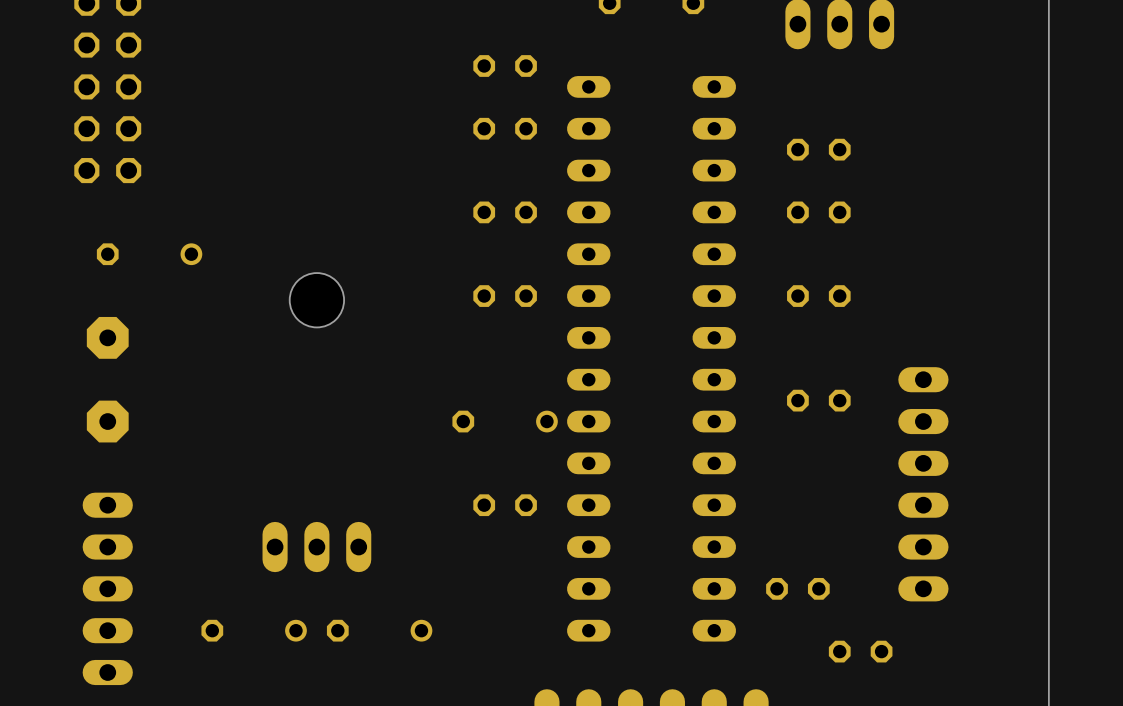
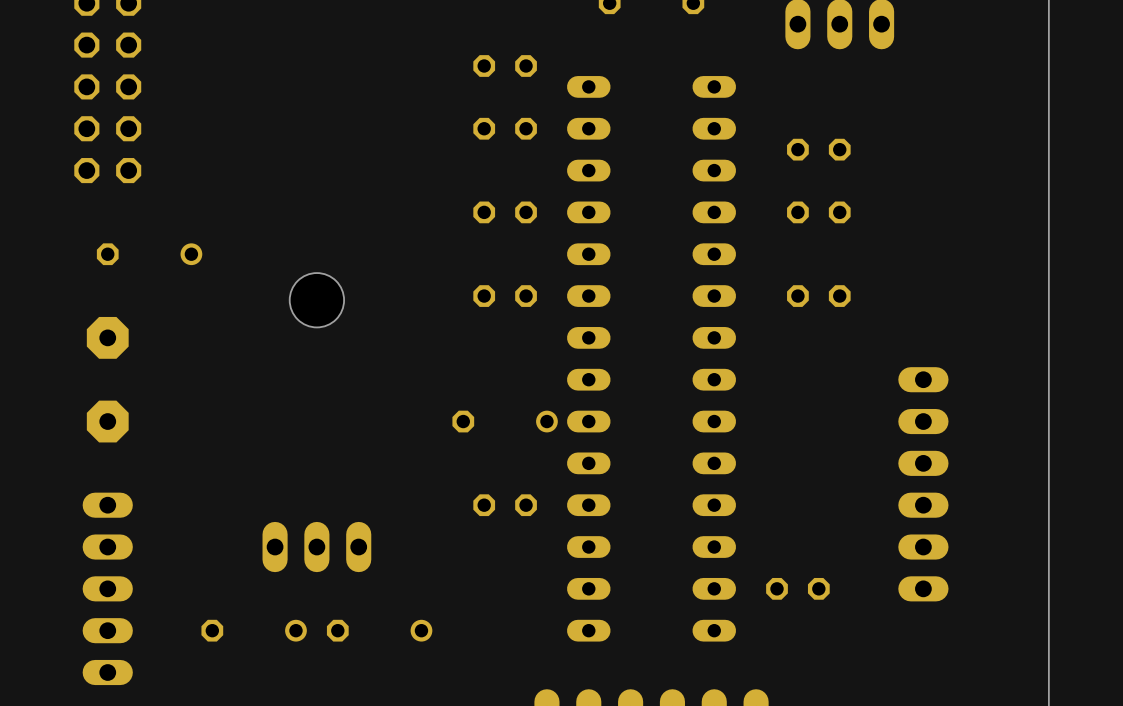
part: (818, 400) -> none
part: (860, 651) -> none

